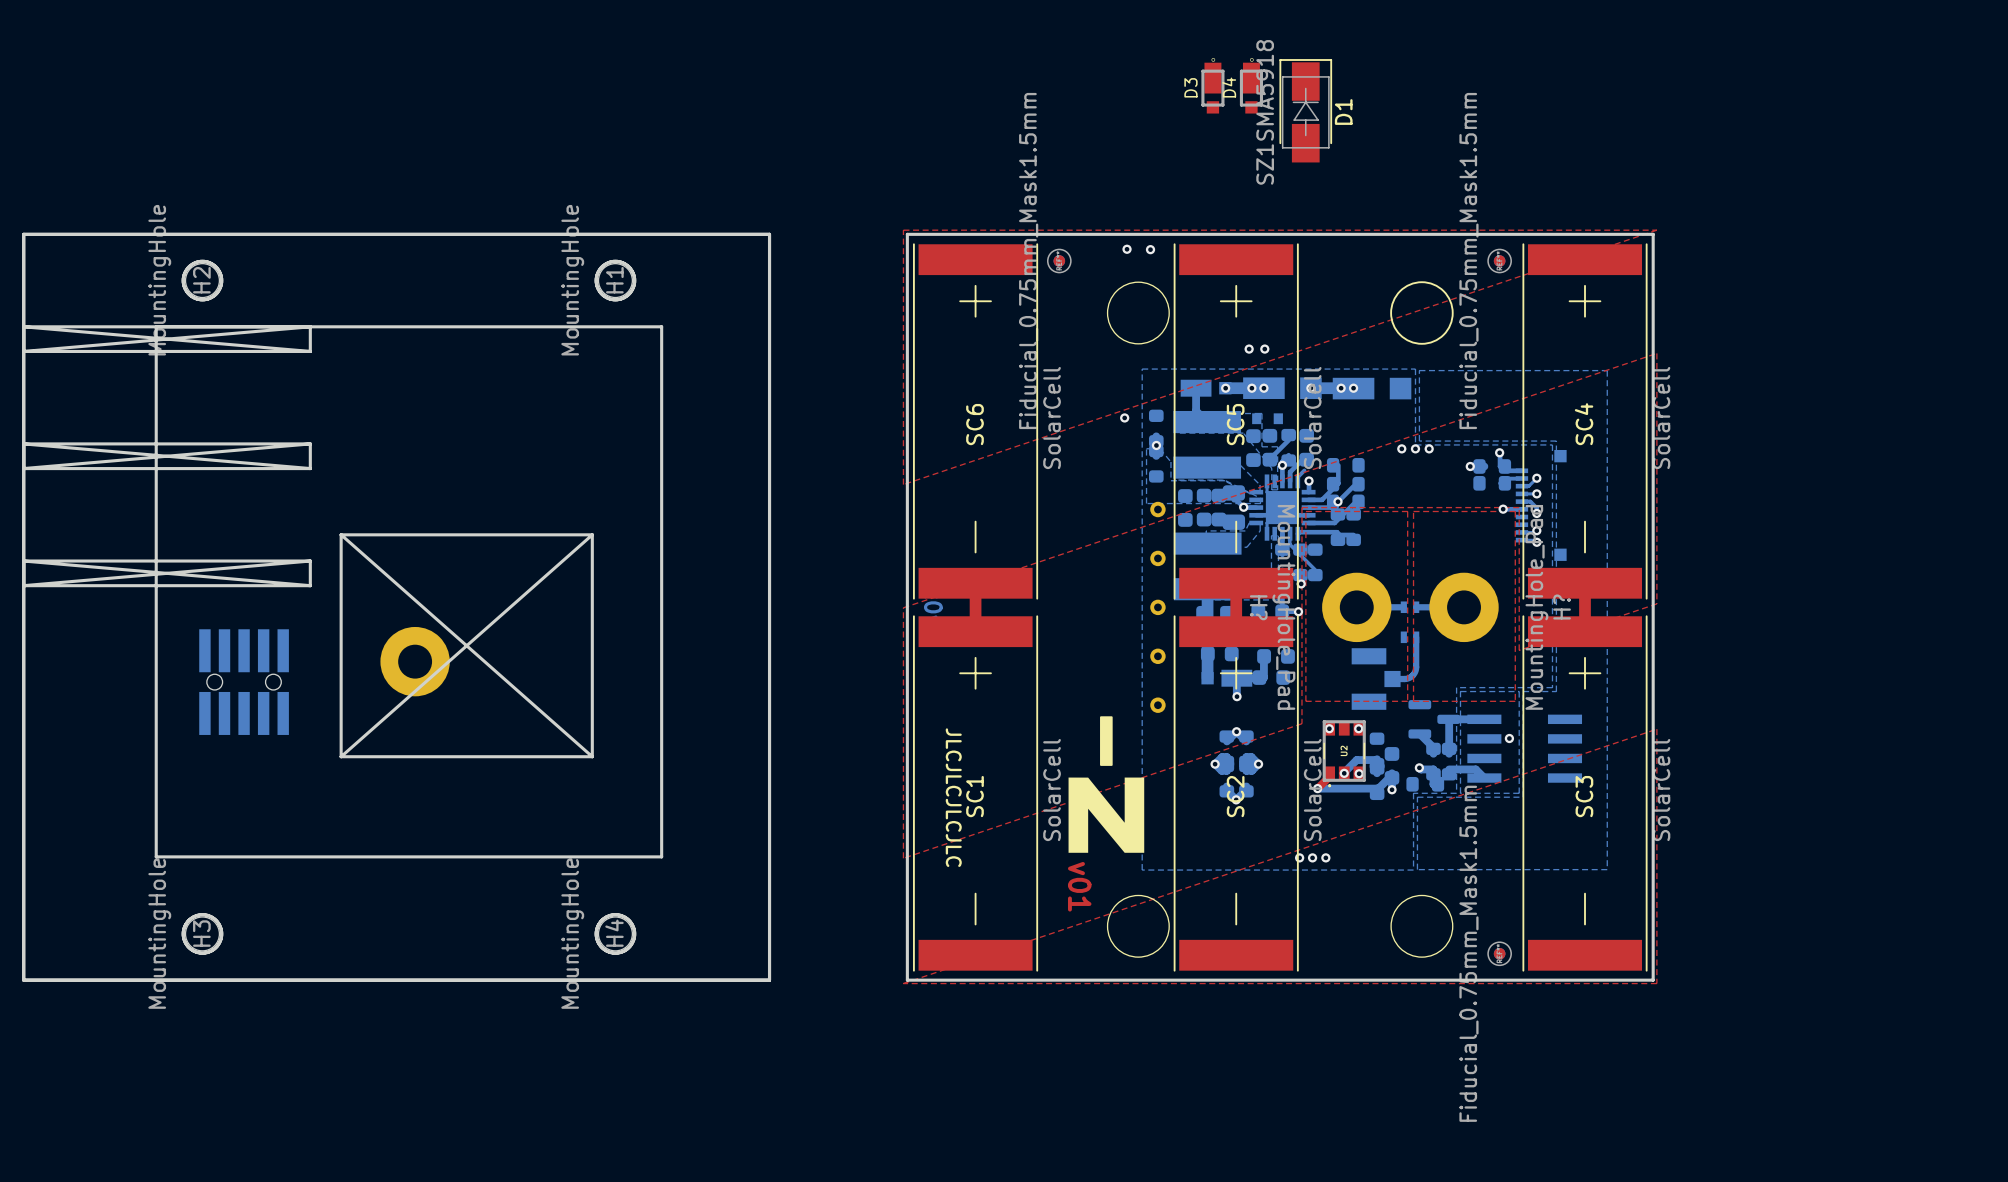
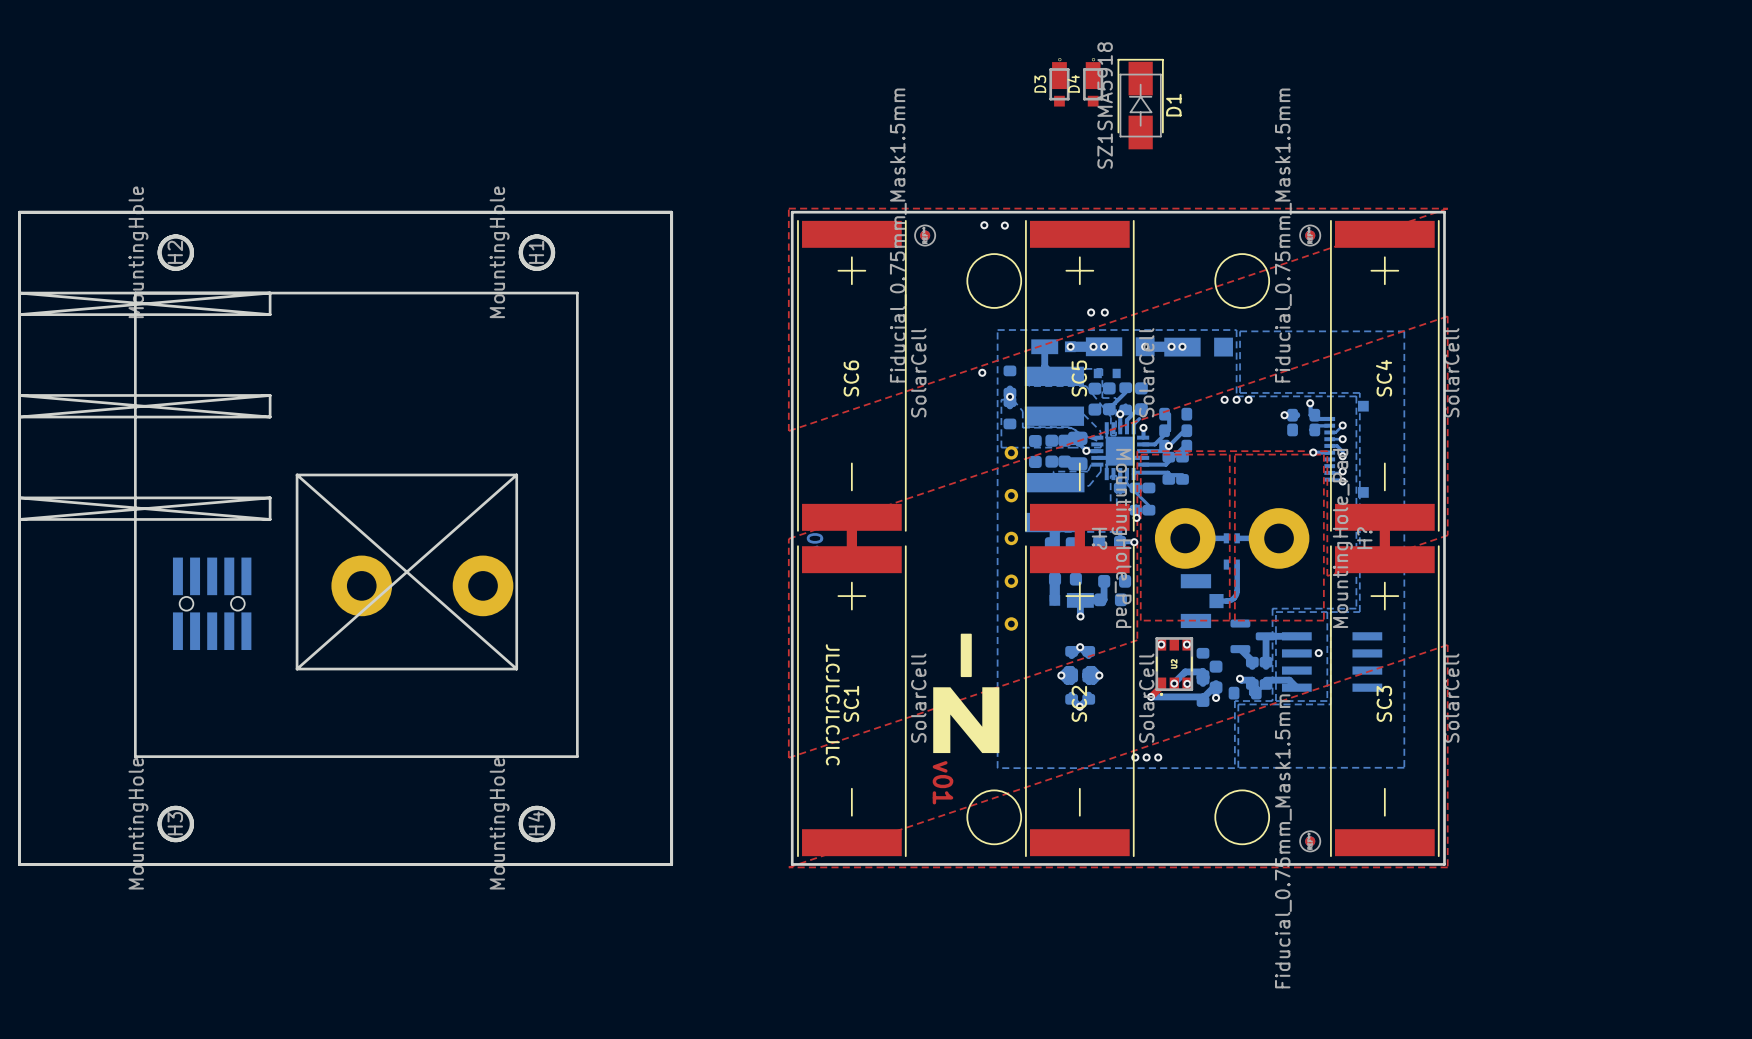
part: none -> (483, 585)

